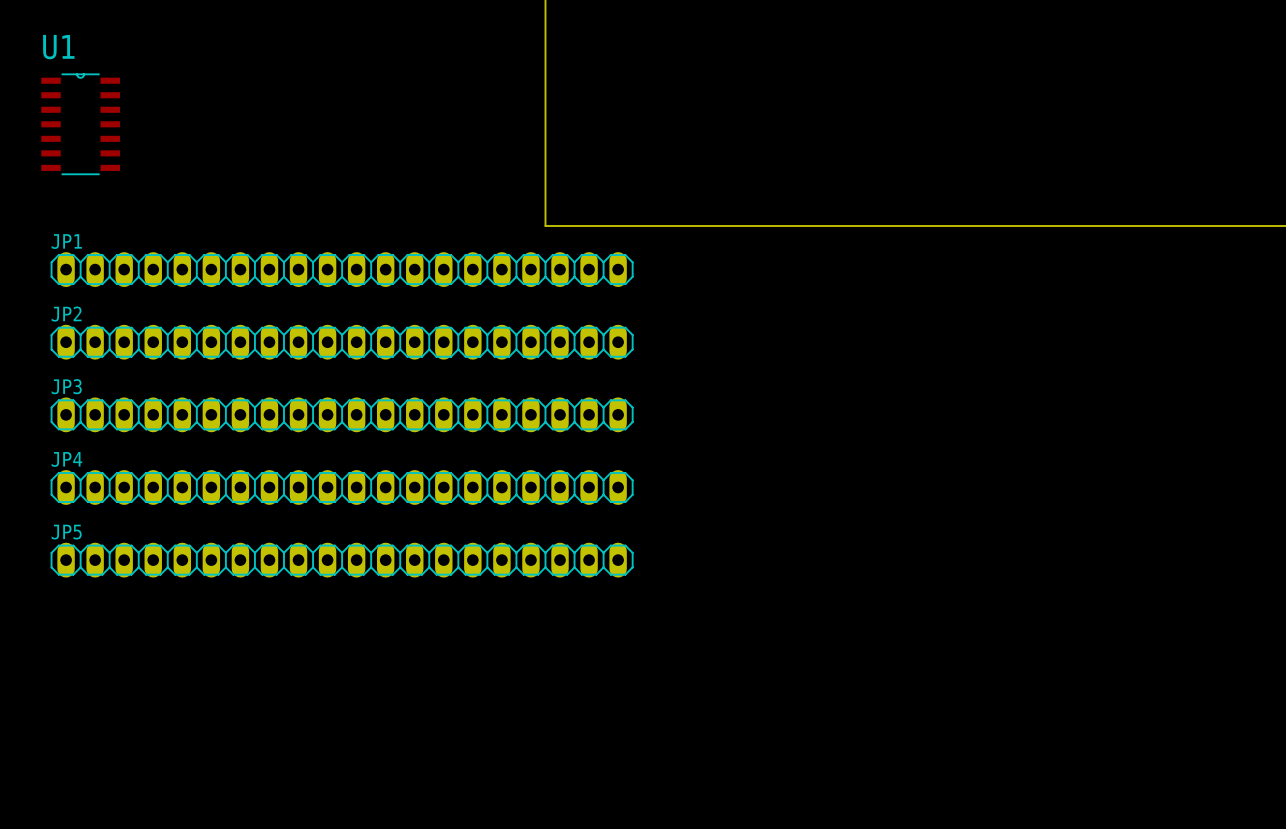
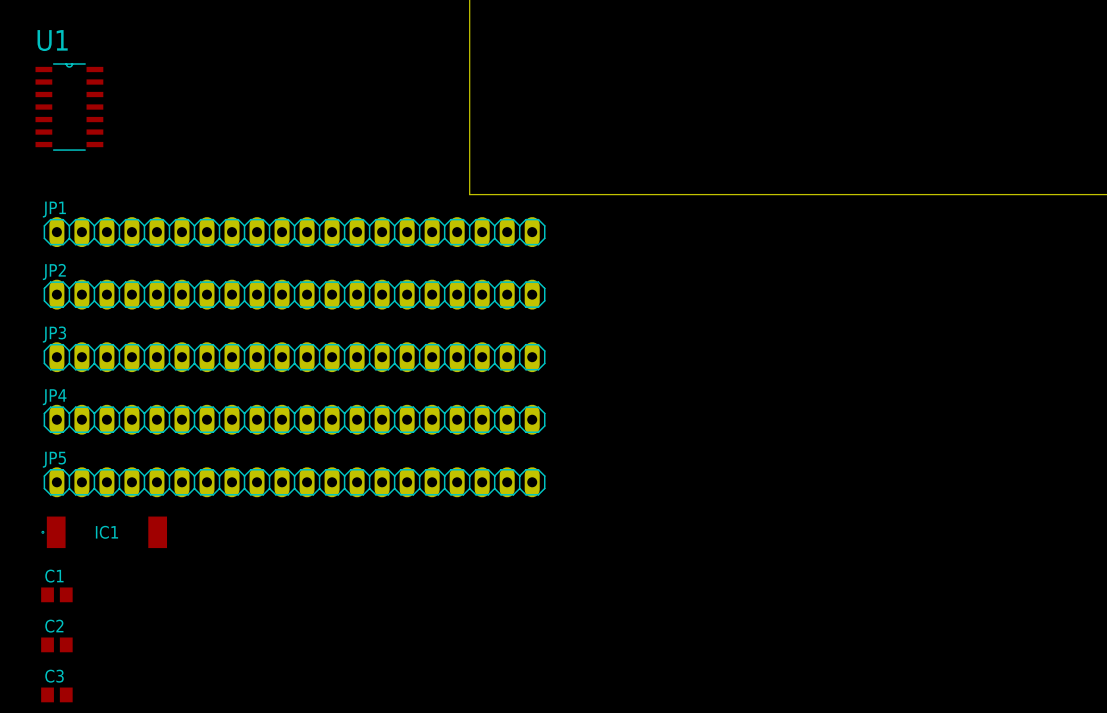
IC1: none -> (104, 532)
C1: none -> (56, 594)
C2: none -> (56, 644)
C3: none -> (56, 694)

